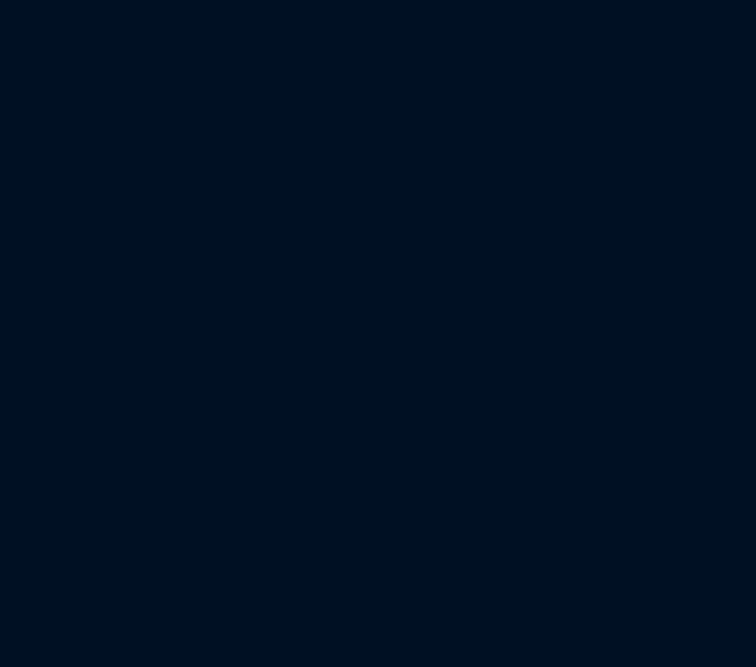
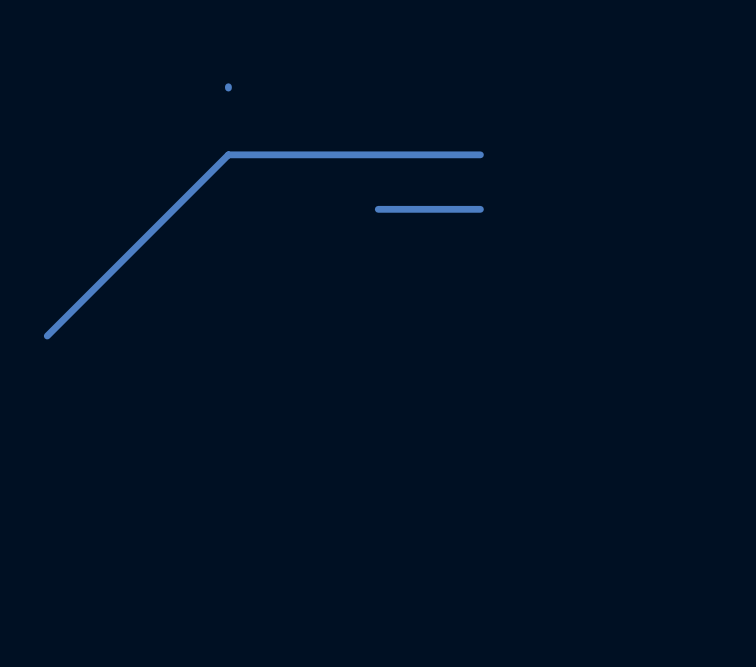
bottom track: none -> (228, 86) (228, 88)
bottom track: none -> (480, 154) (228, 154) (47, 336)
bottom track: none -> (480, 209) (378, 209)

